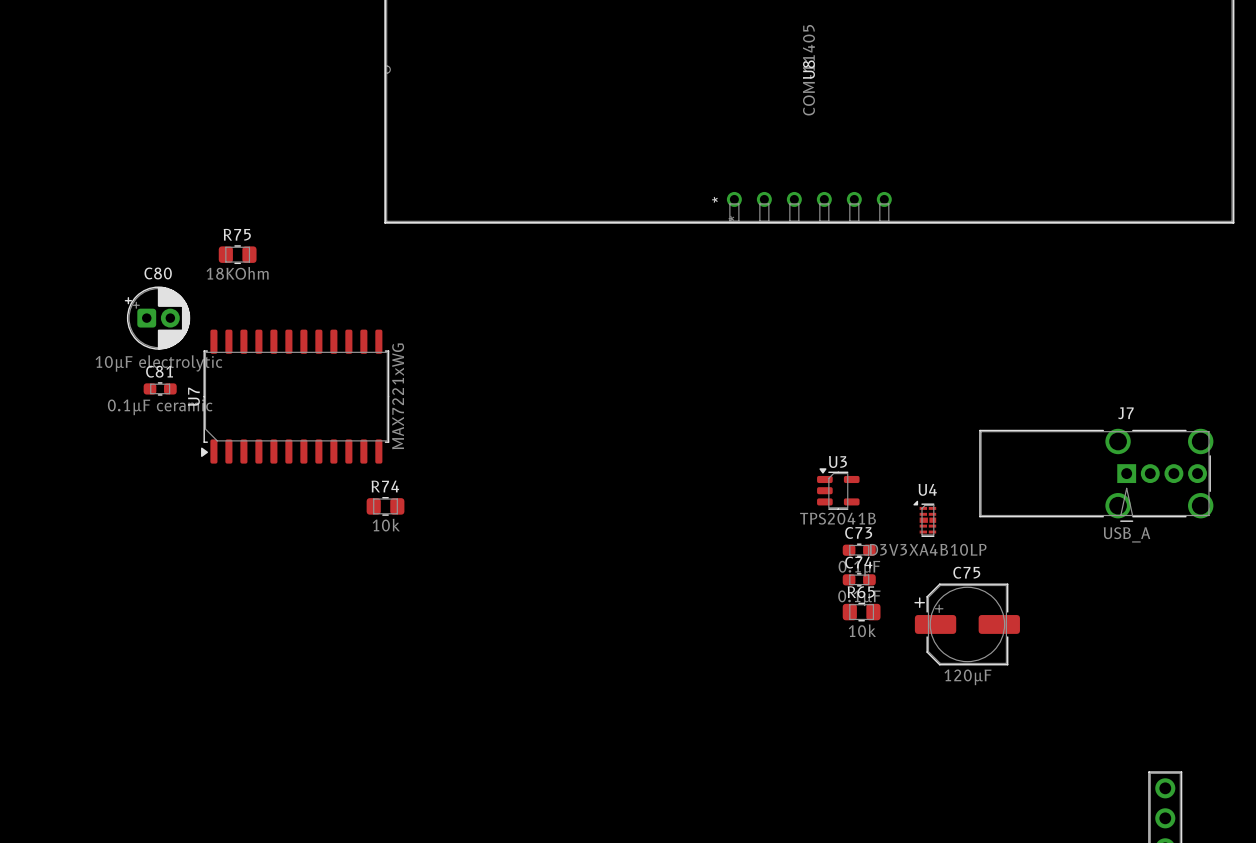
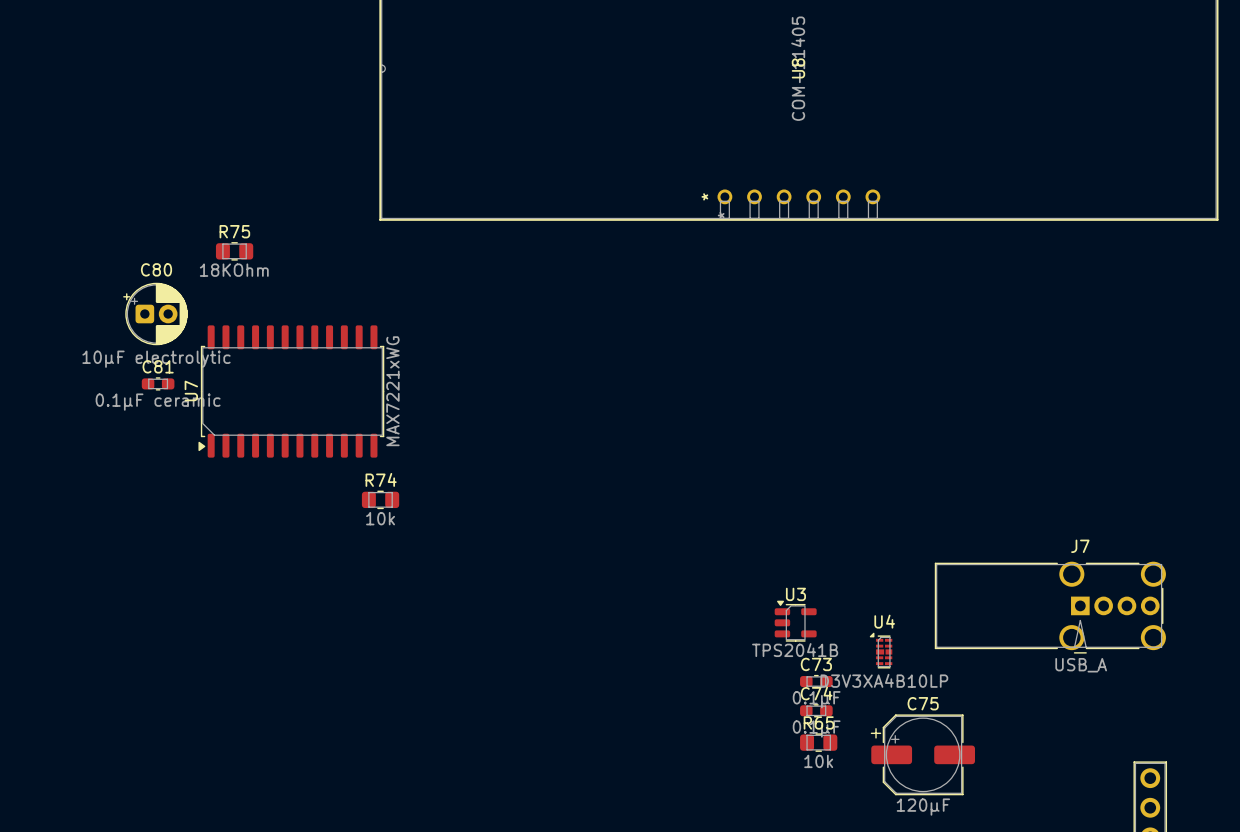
J7 position: (1096, 475) -> (1050, 607)
U3 position: (838, 489) -> (795, 621)
U4 position: (924, 518) -> (881, 650)
C73 position: (859, 550) -> (816, 681)
C74 position: (859, 579) -> (816, 710)
C75 footprint: [914, 583, 1020, 666] -> [870, 714, 975, 796]
R65 position: (861, 612) -> (818, 742)

